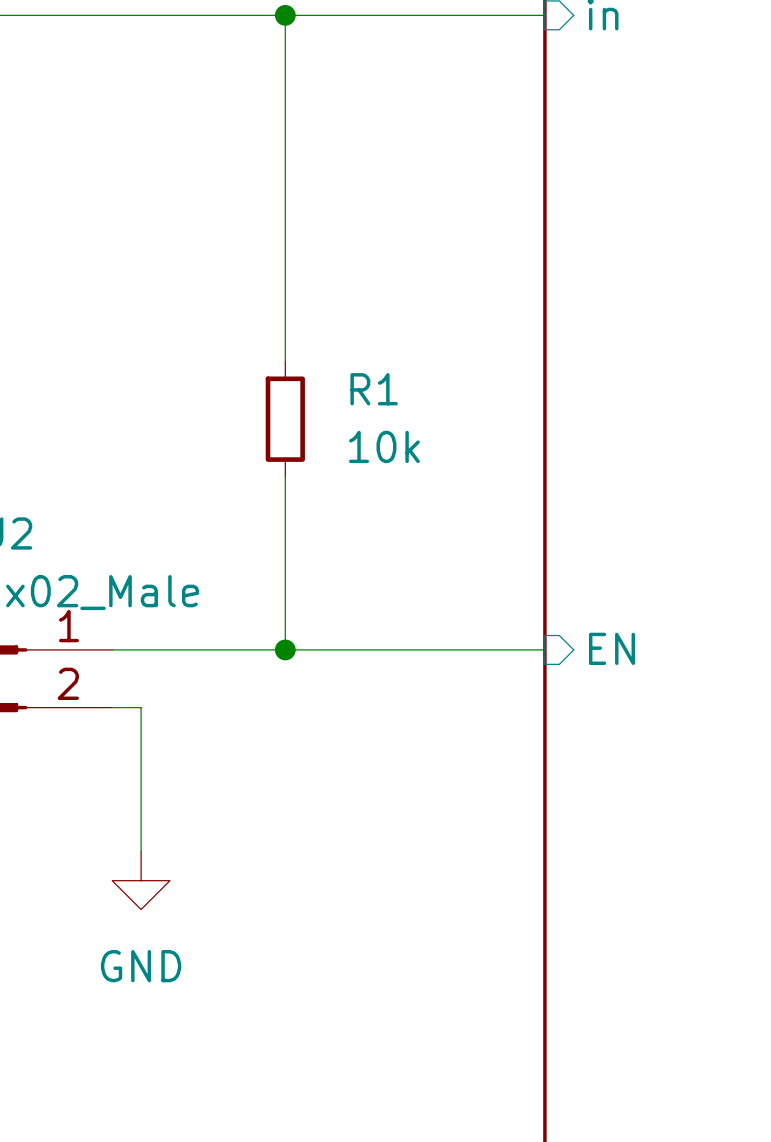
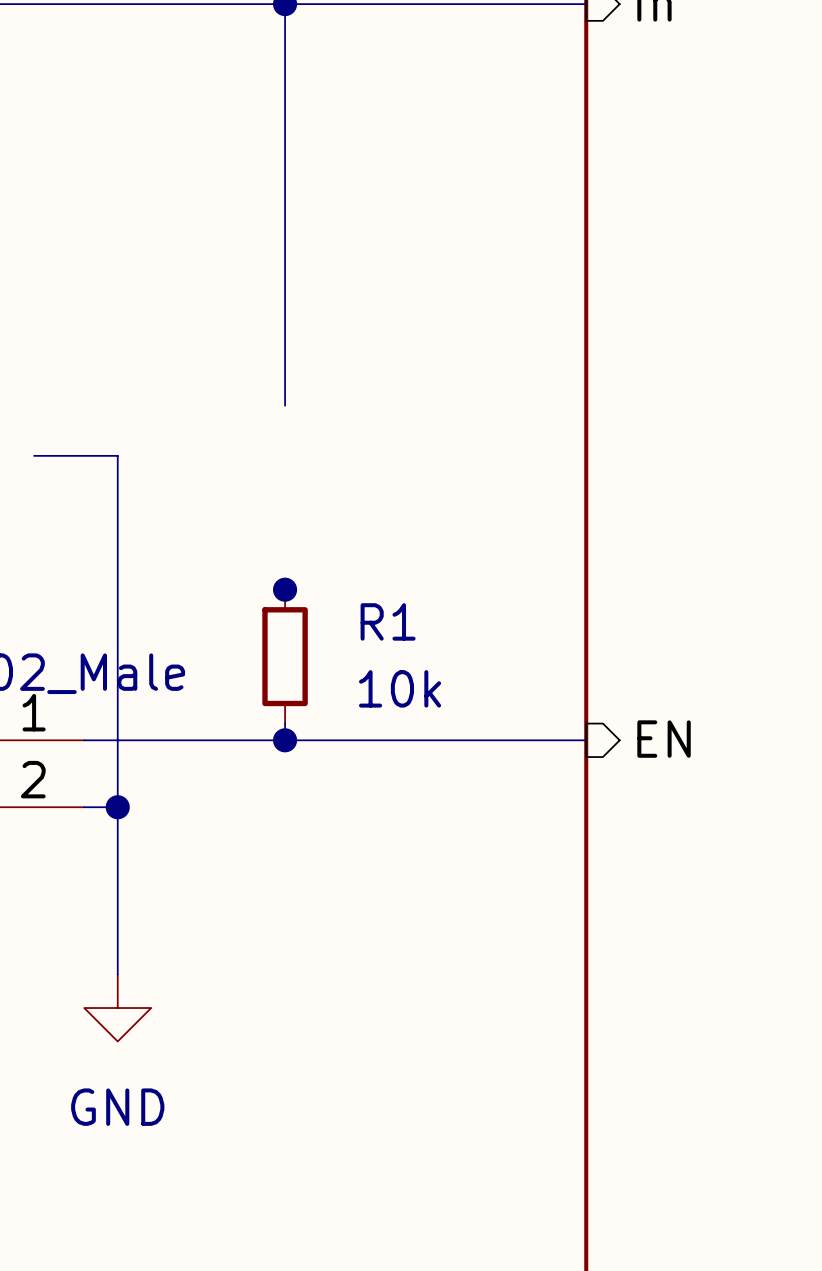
wire: none -> (34, 455) (117, 455) (117, 807)
R1 position: (285, 419) -> (285, 656)
wire: (285, 476) (285, 635) -> none
junction: none -> (285, 589)
junction: none -> (117, 807)

